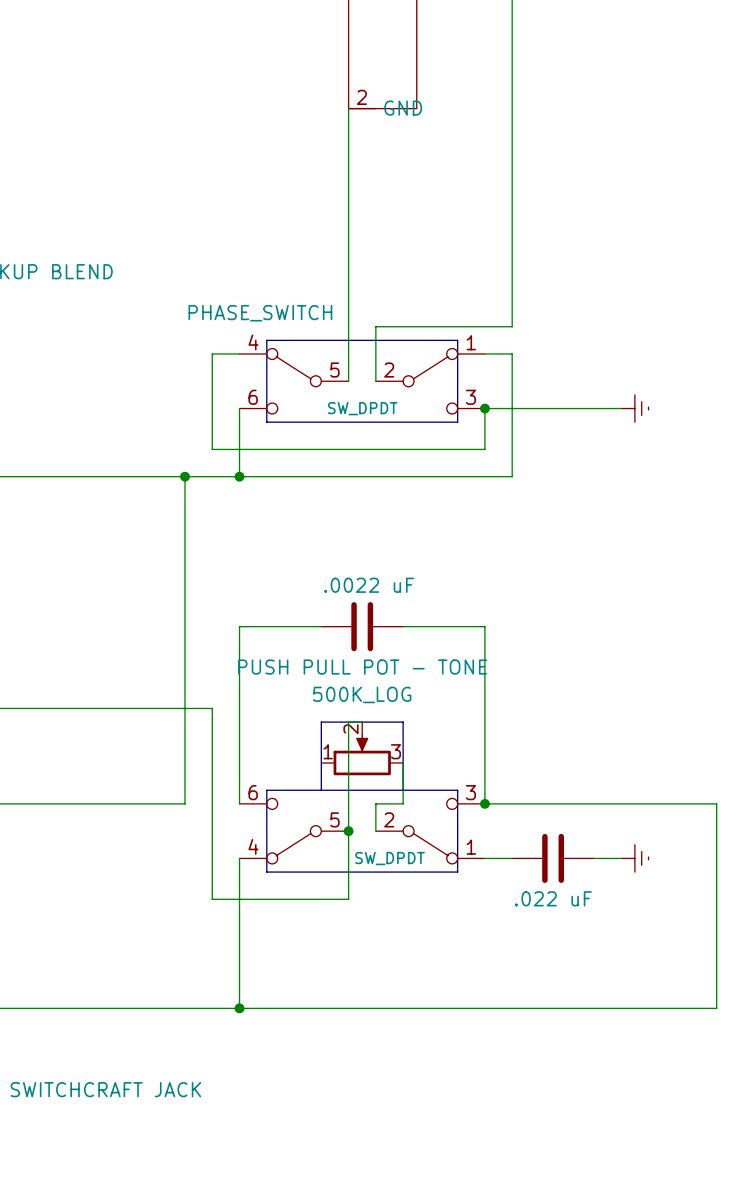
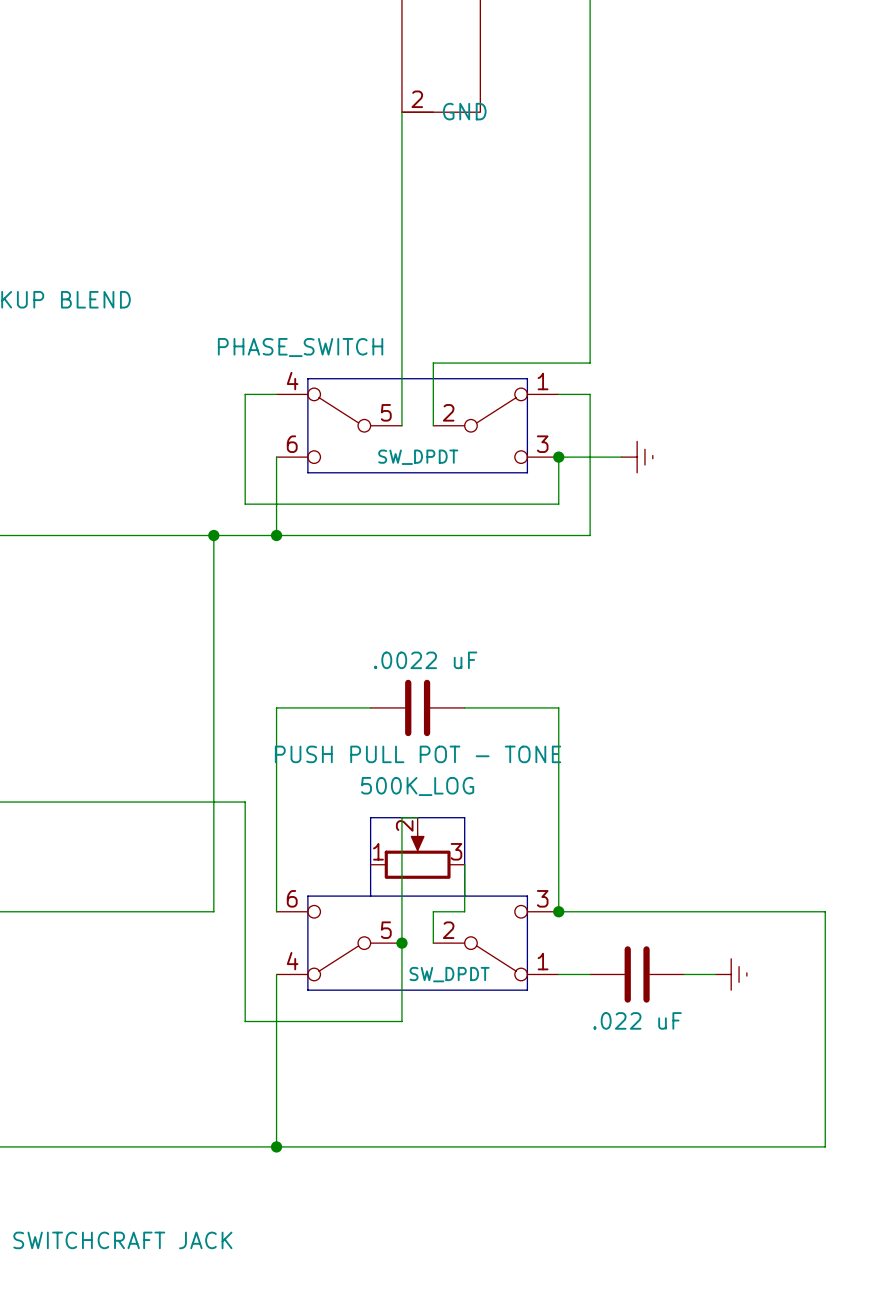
wire: (539, 408) (621, 408) -> none
power symbol position: (634, 408) -> (637, 457)

